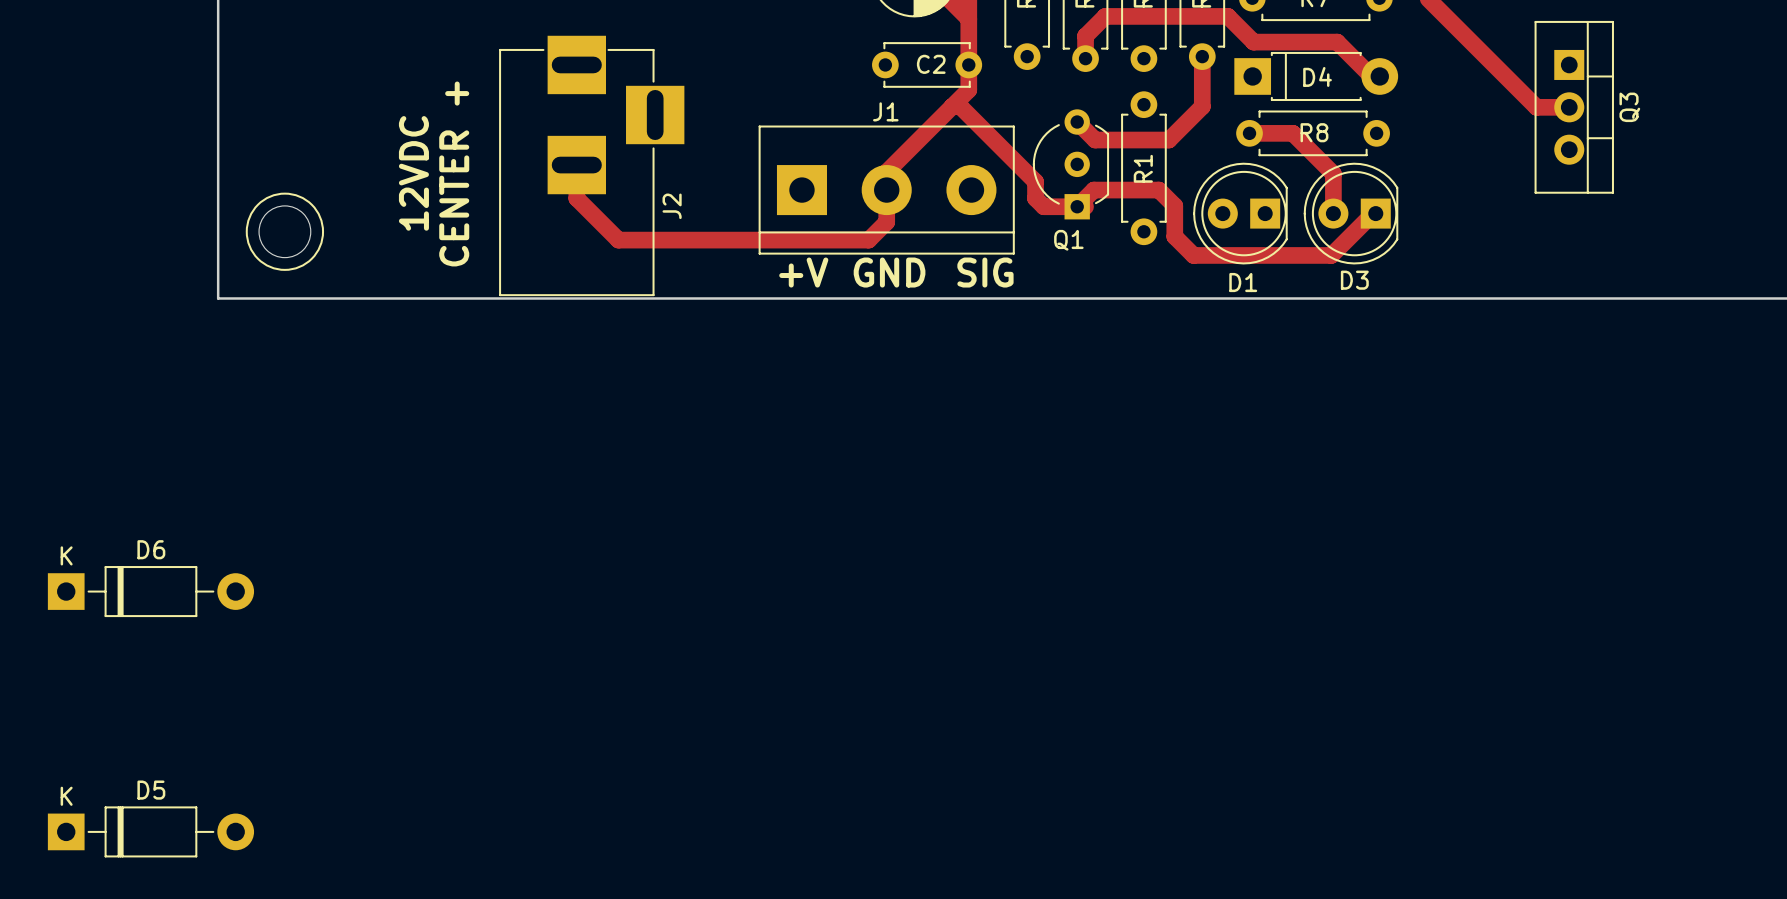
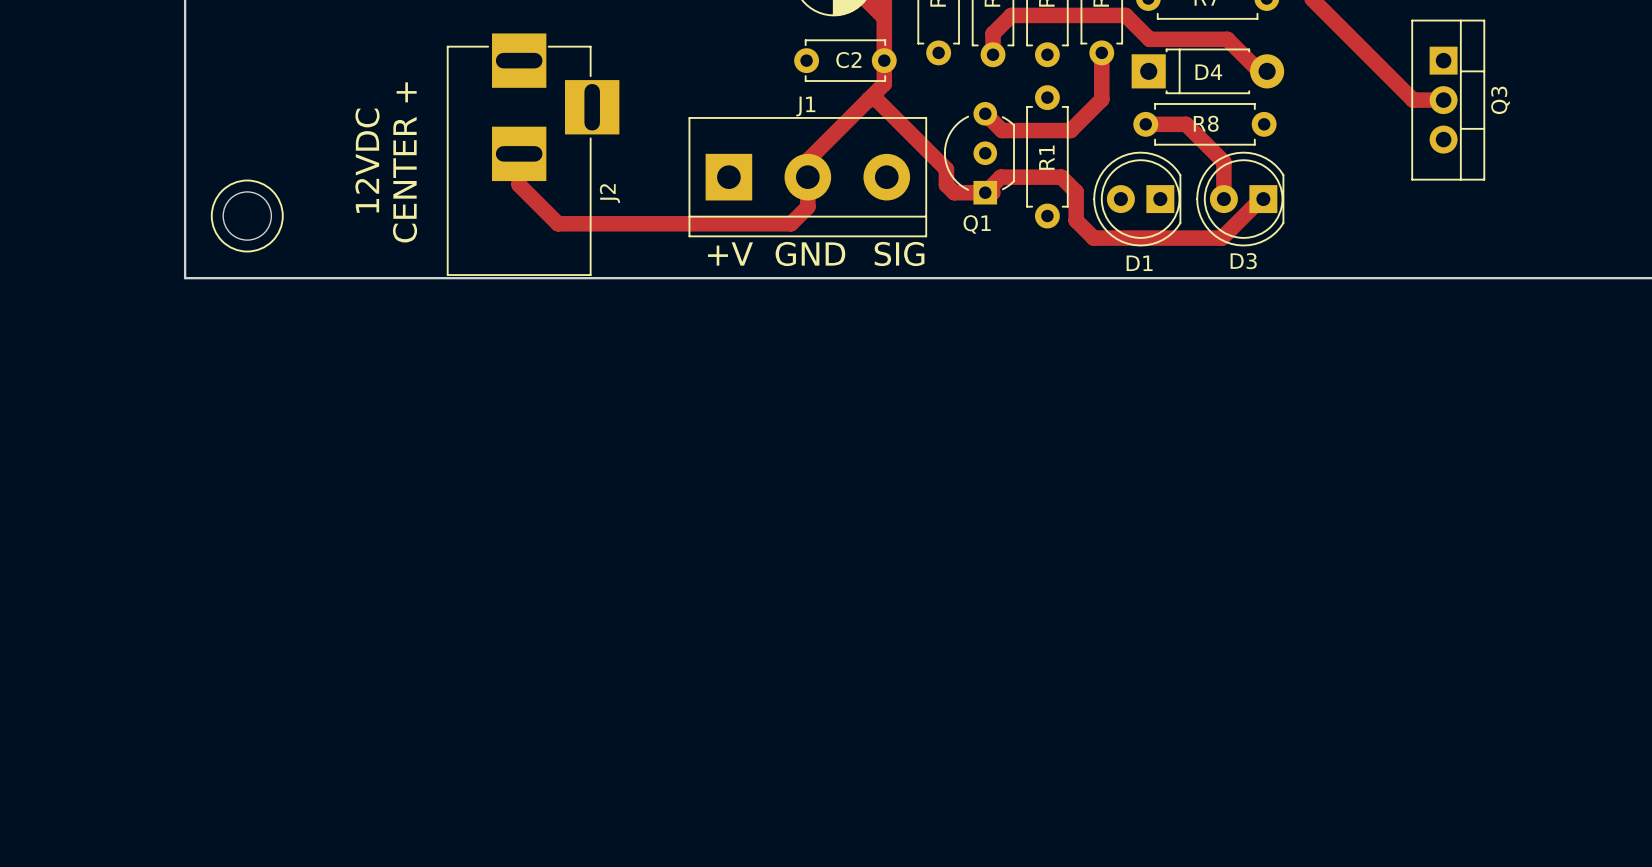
D6: (150, 591) -> none
D5: (150, 831) -> none

